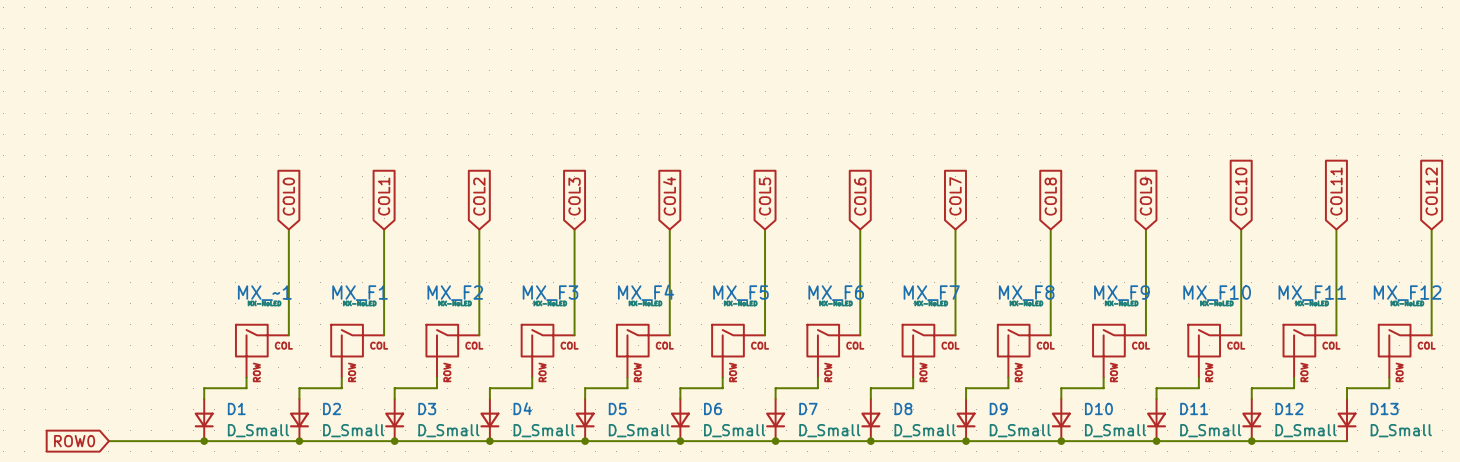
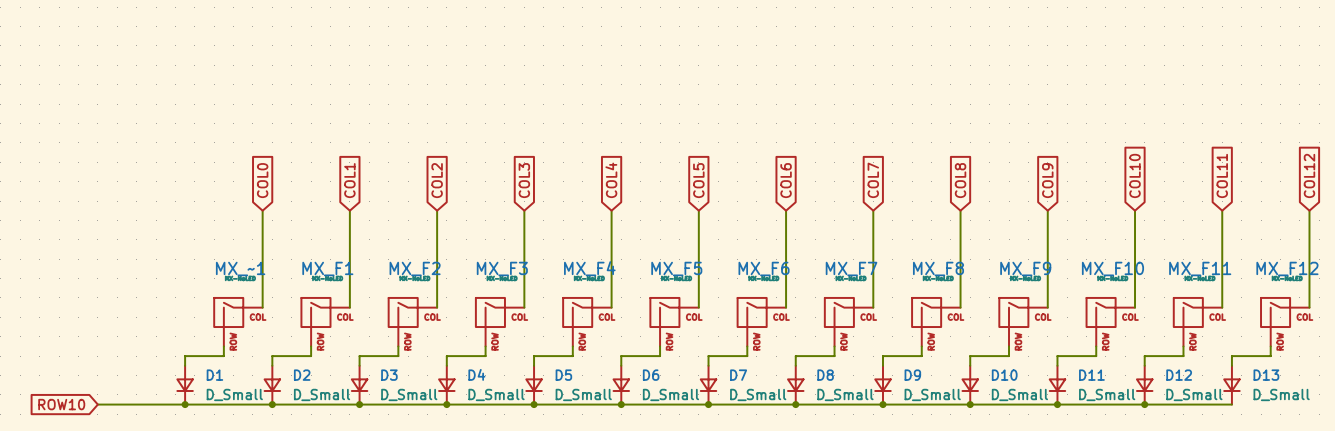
global label: ROW0 (74, 441) -> ROW10 (61, 404)

